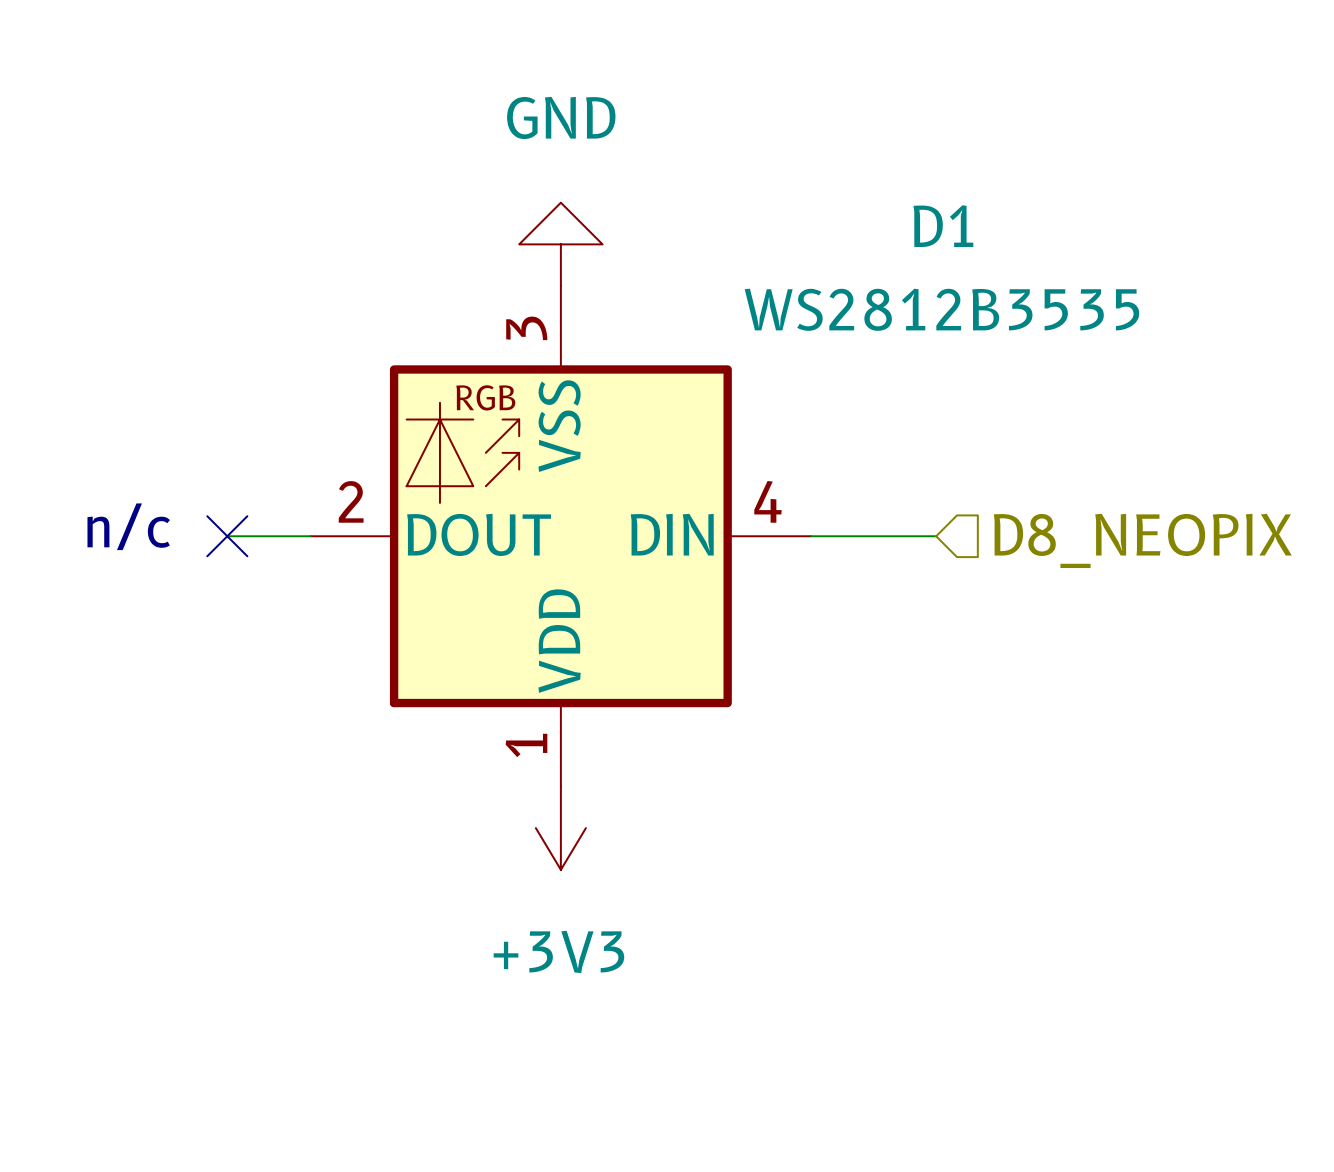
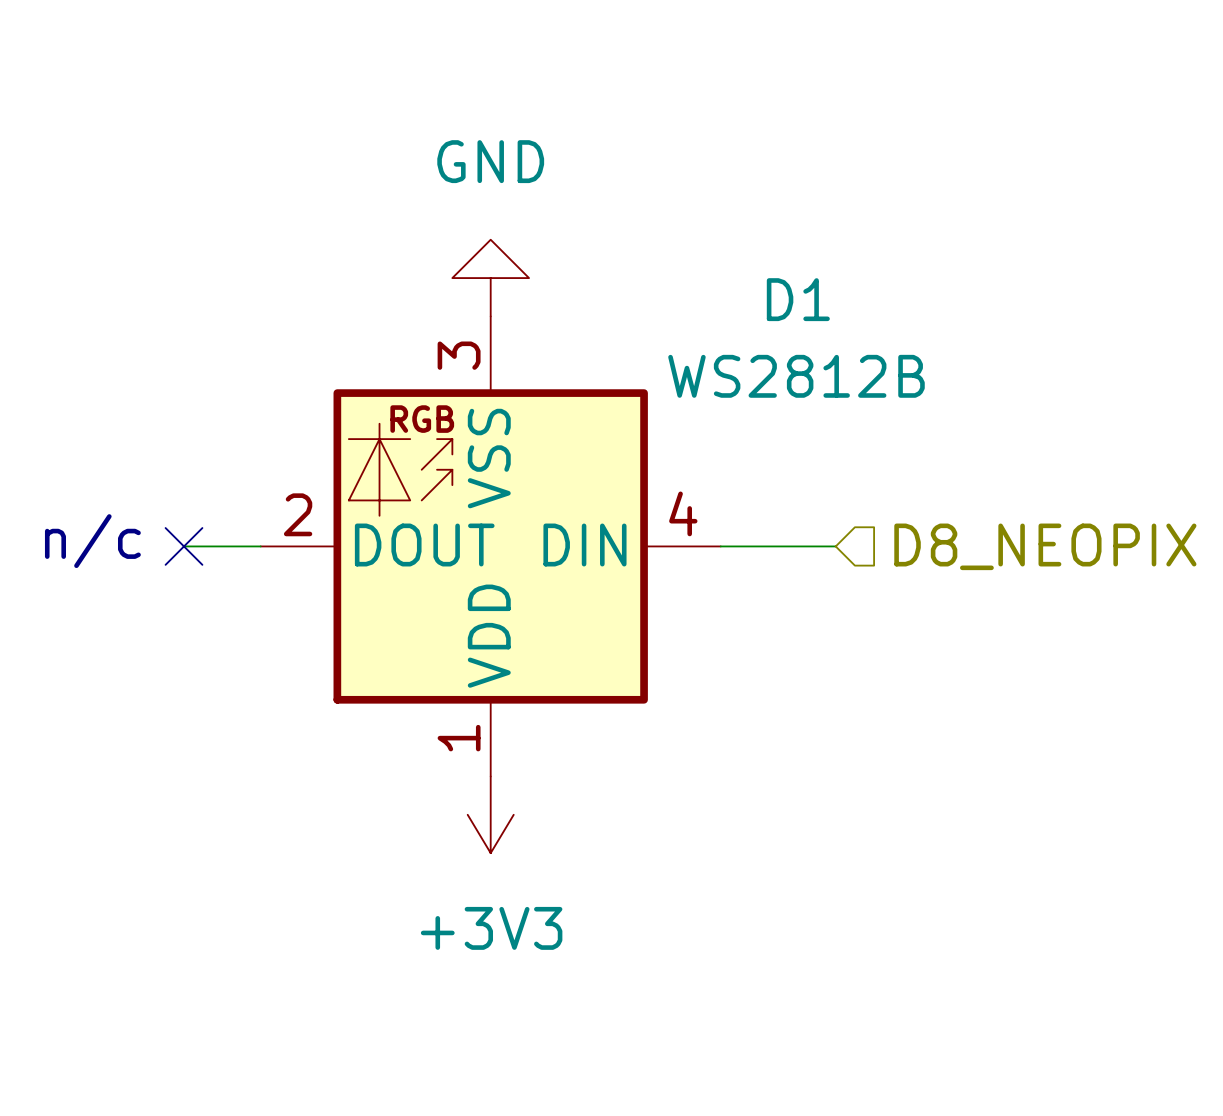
D1 name position: D1 (943, 226) -> D1 (798, 299)
D1 value: WS2812B3535 (941, 309) -> WS2812B (796, 376)

